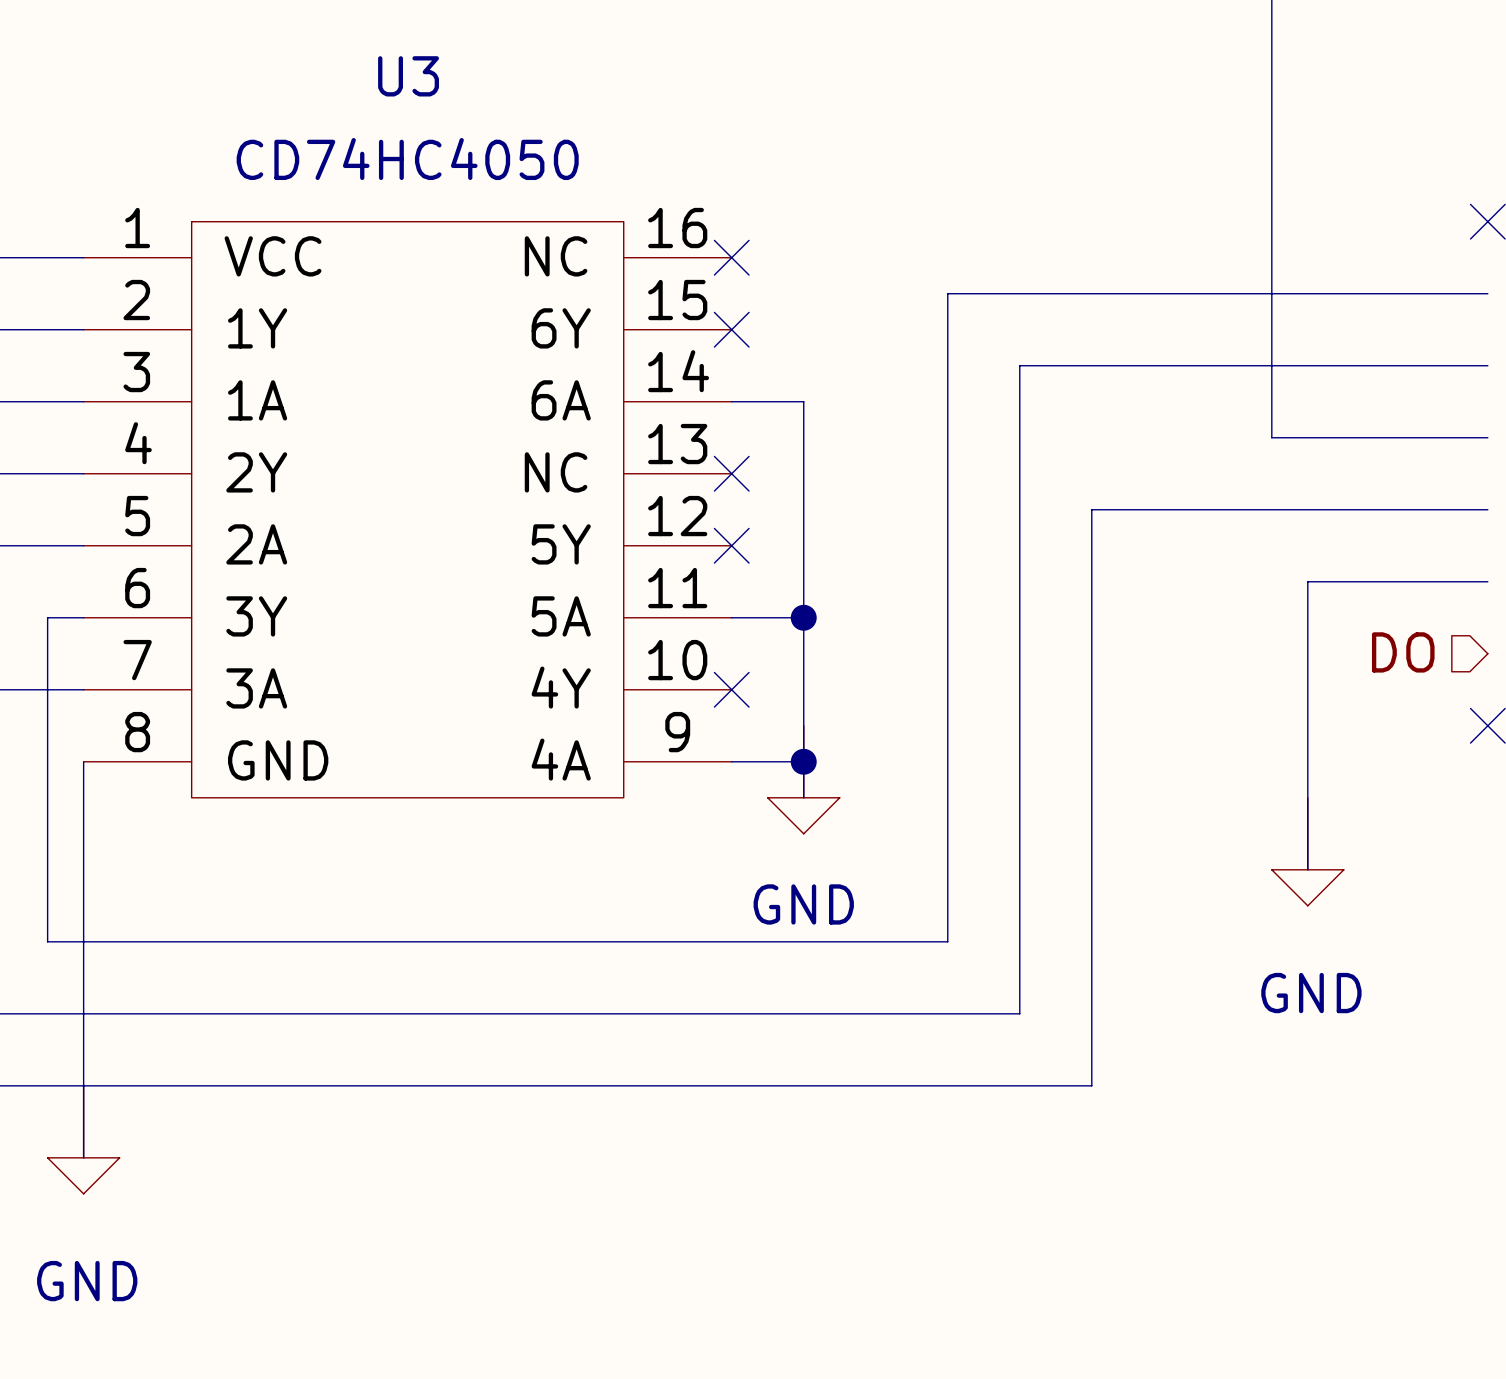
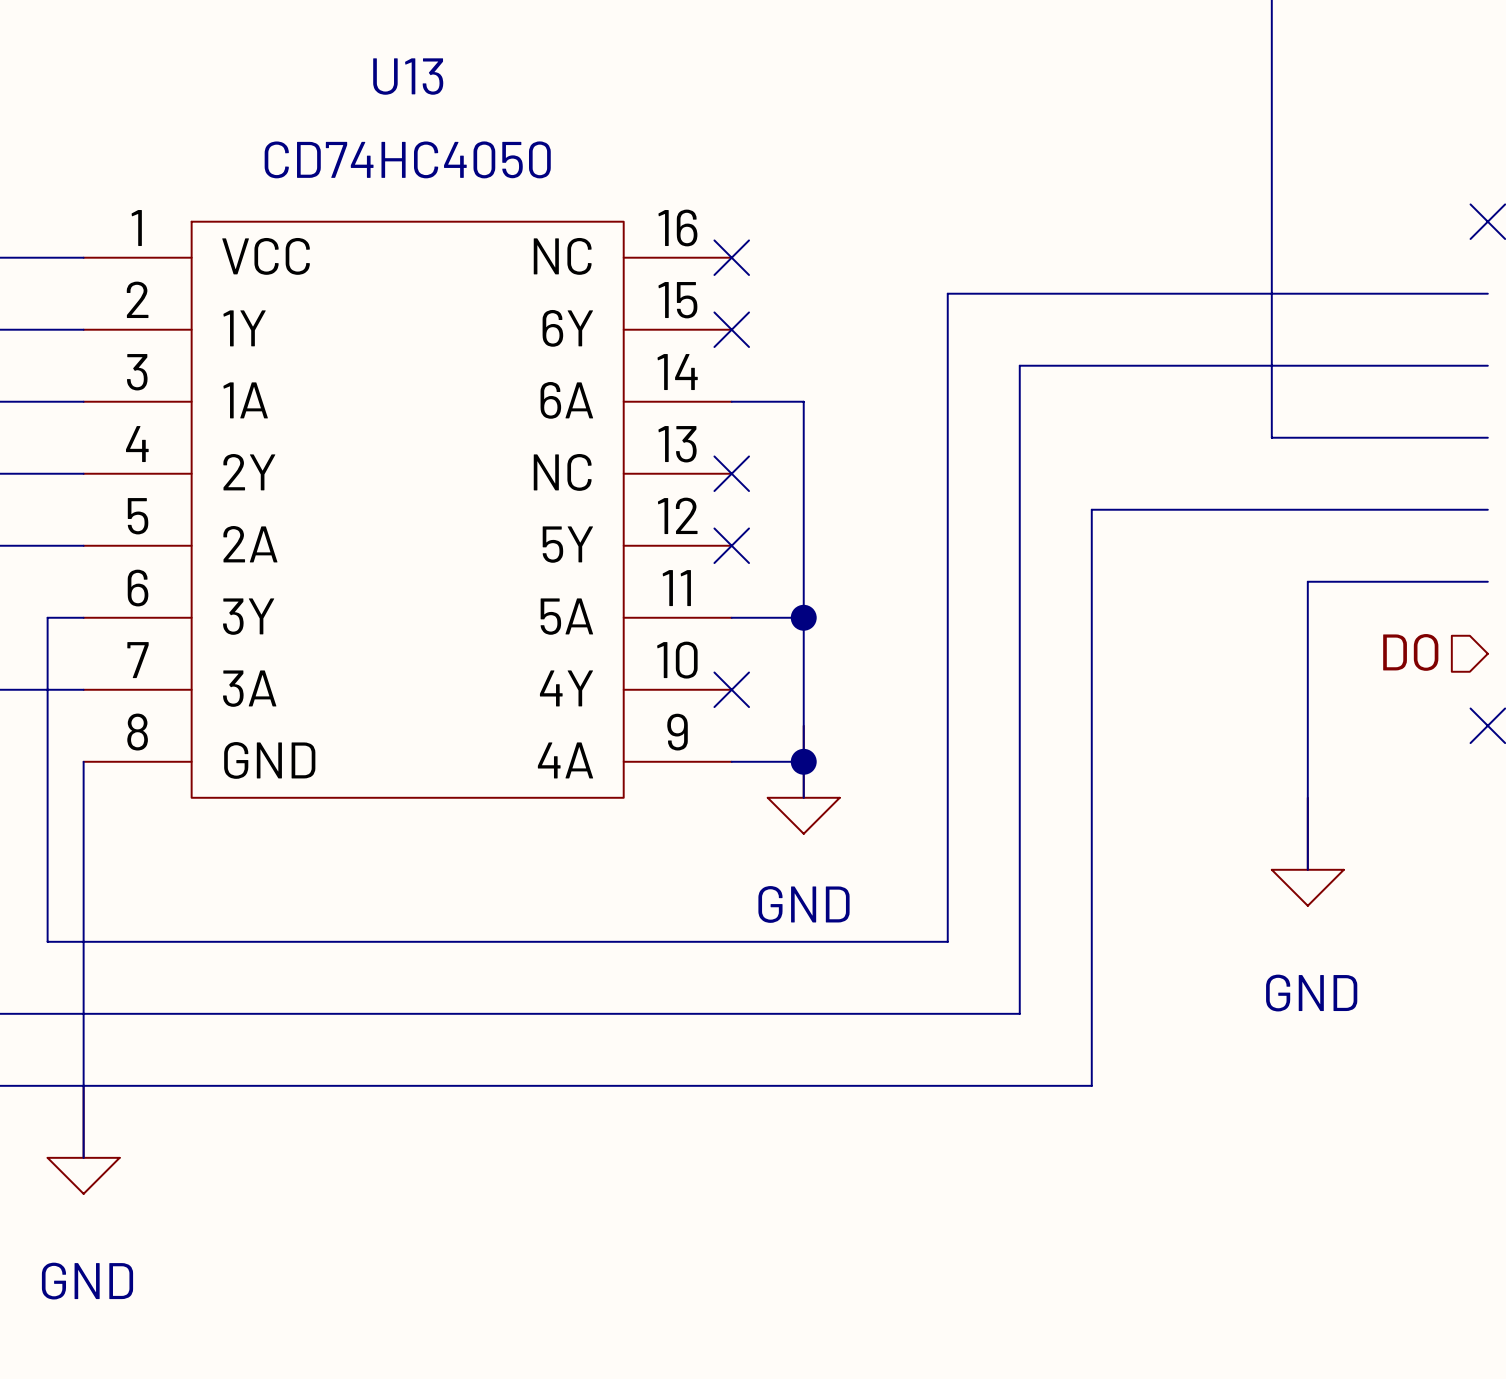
U3 name: U3 (408, 76) -> U13 (408, 76)

